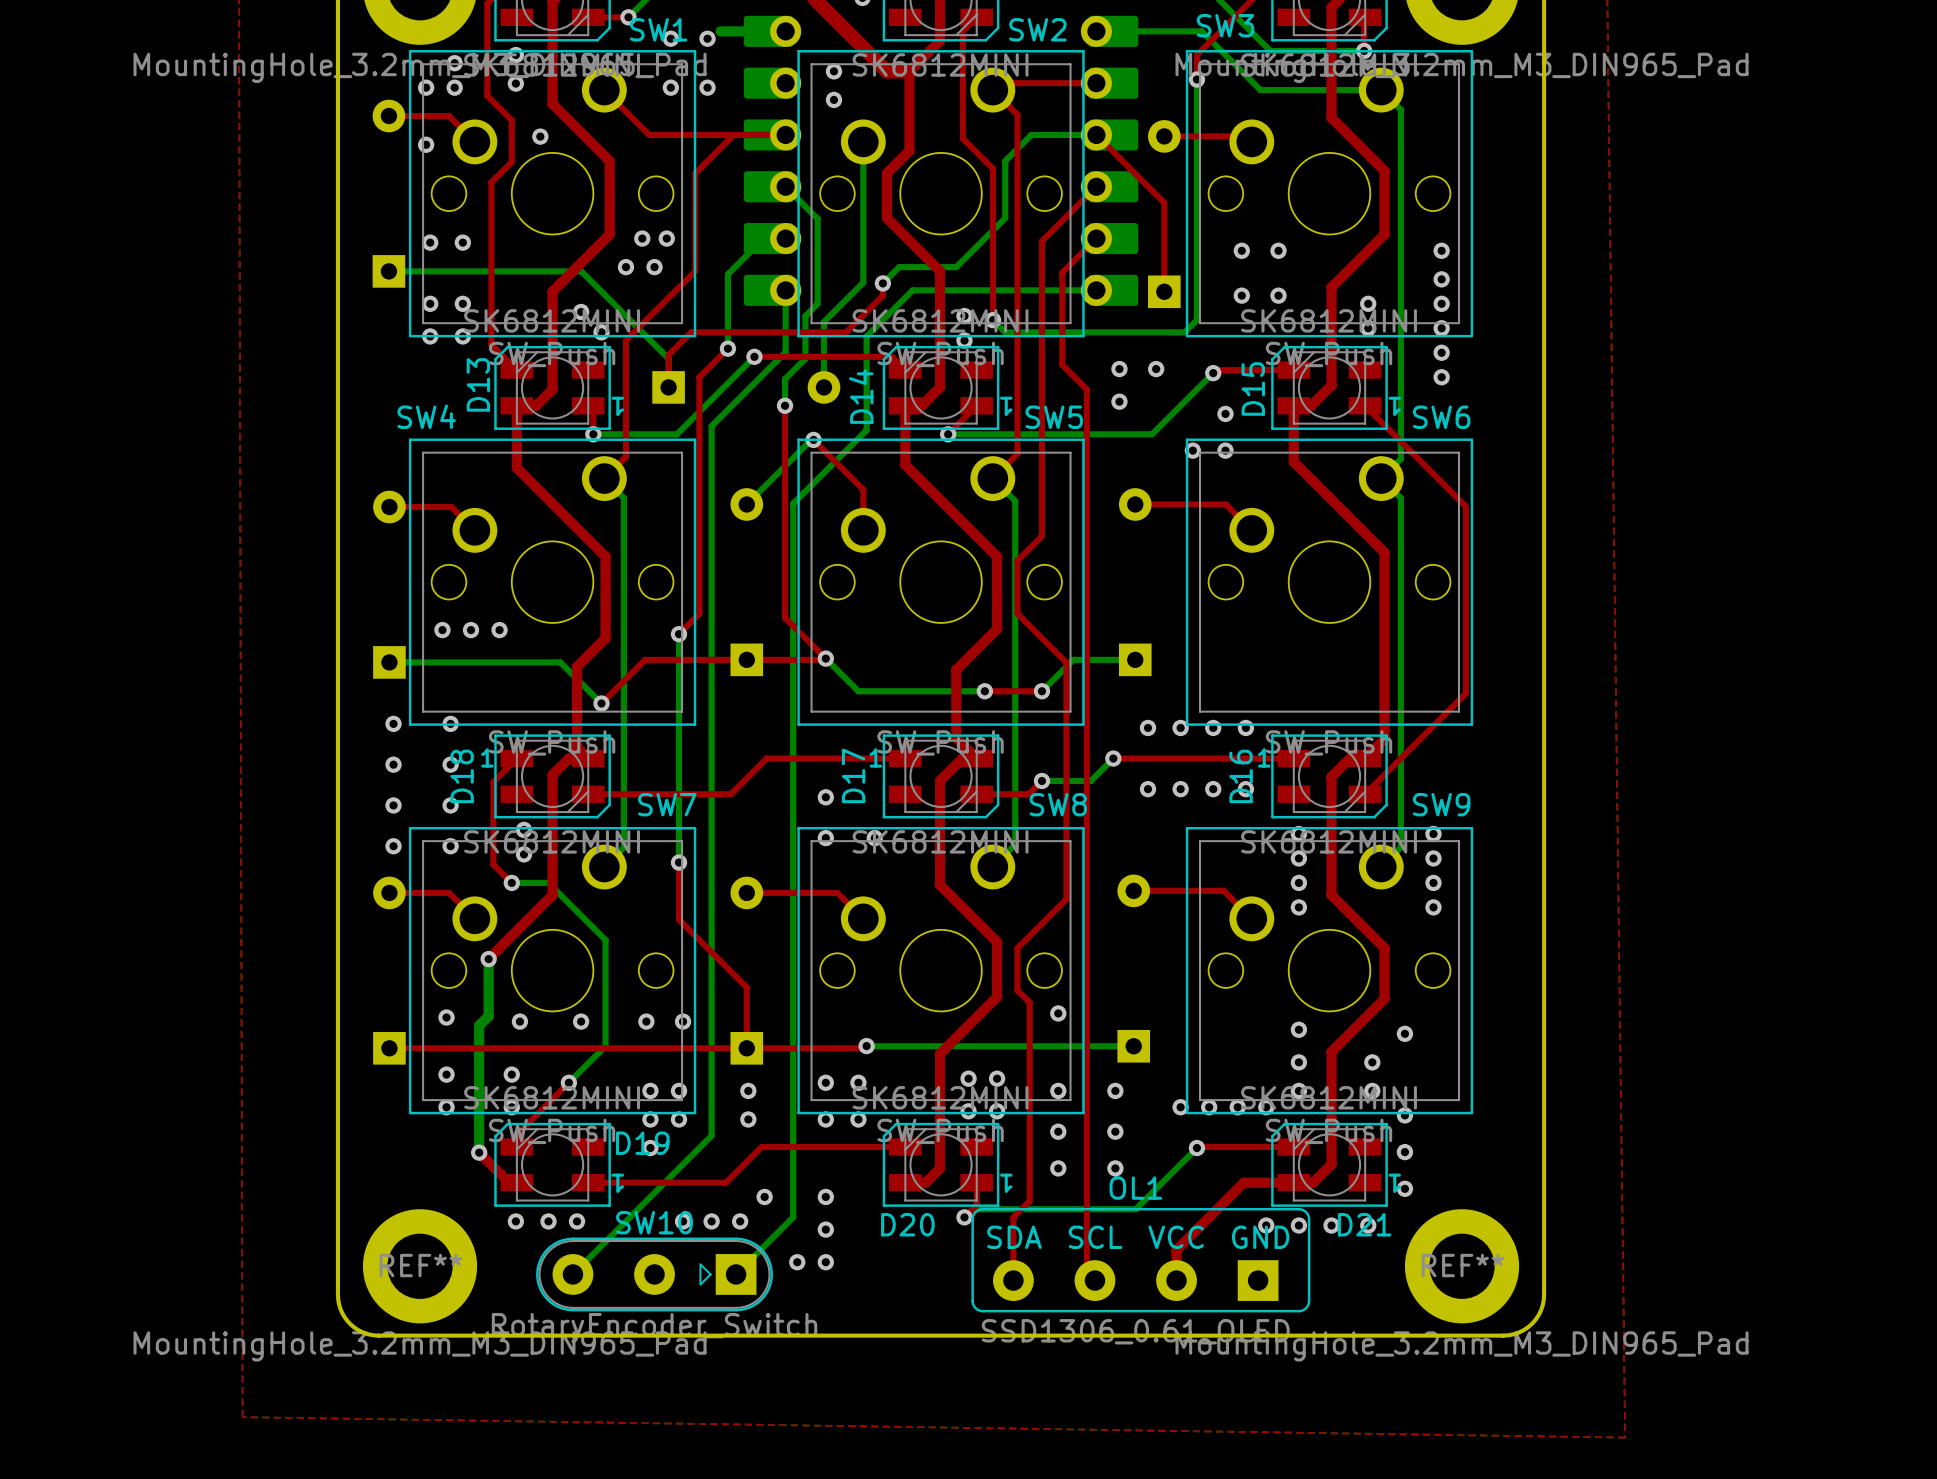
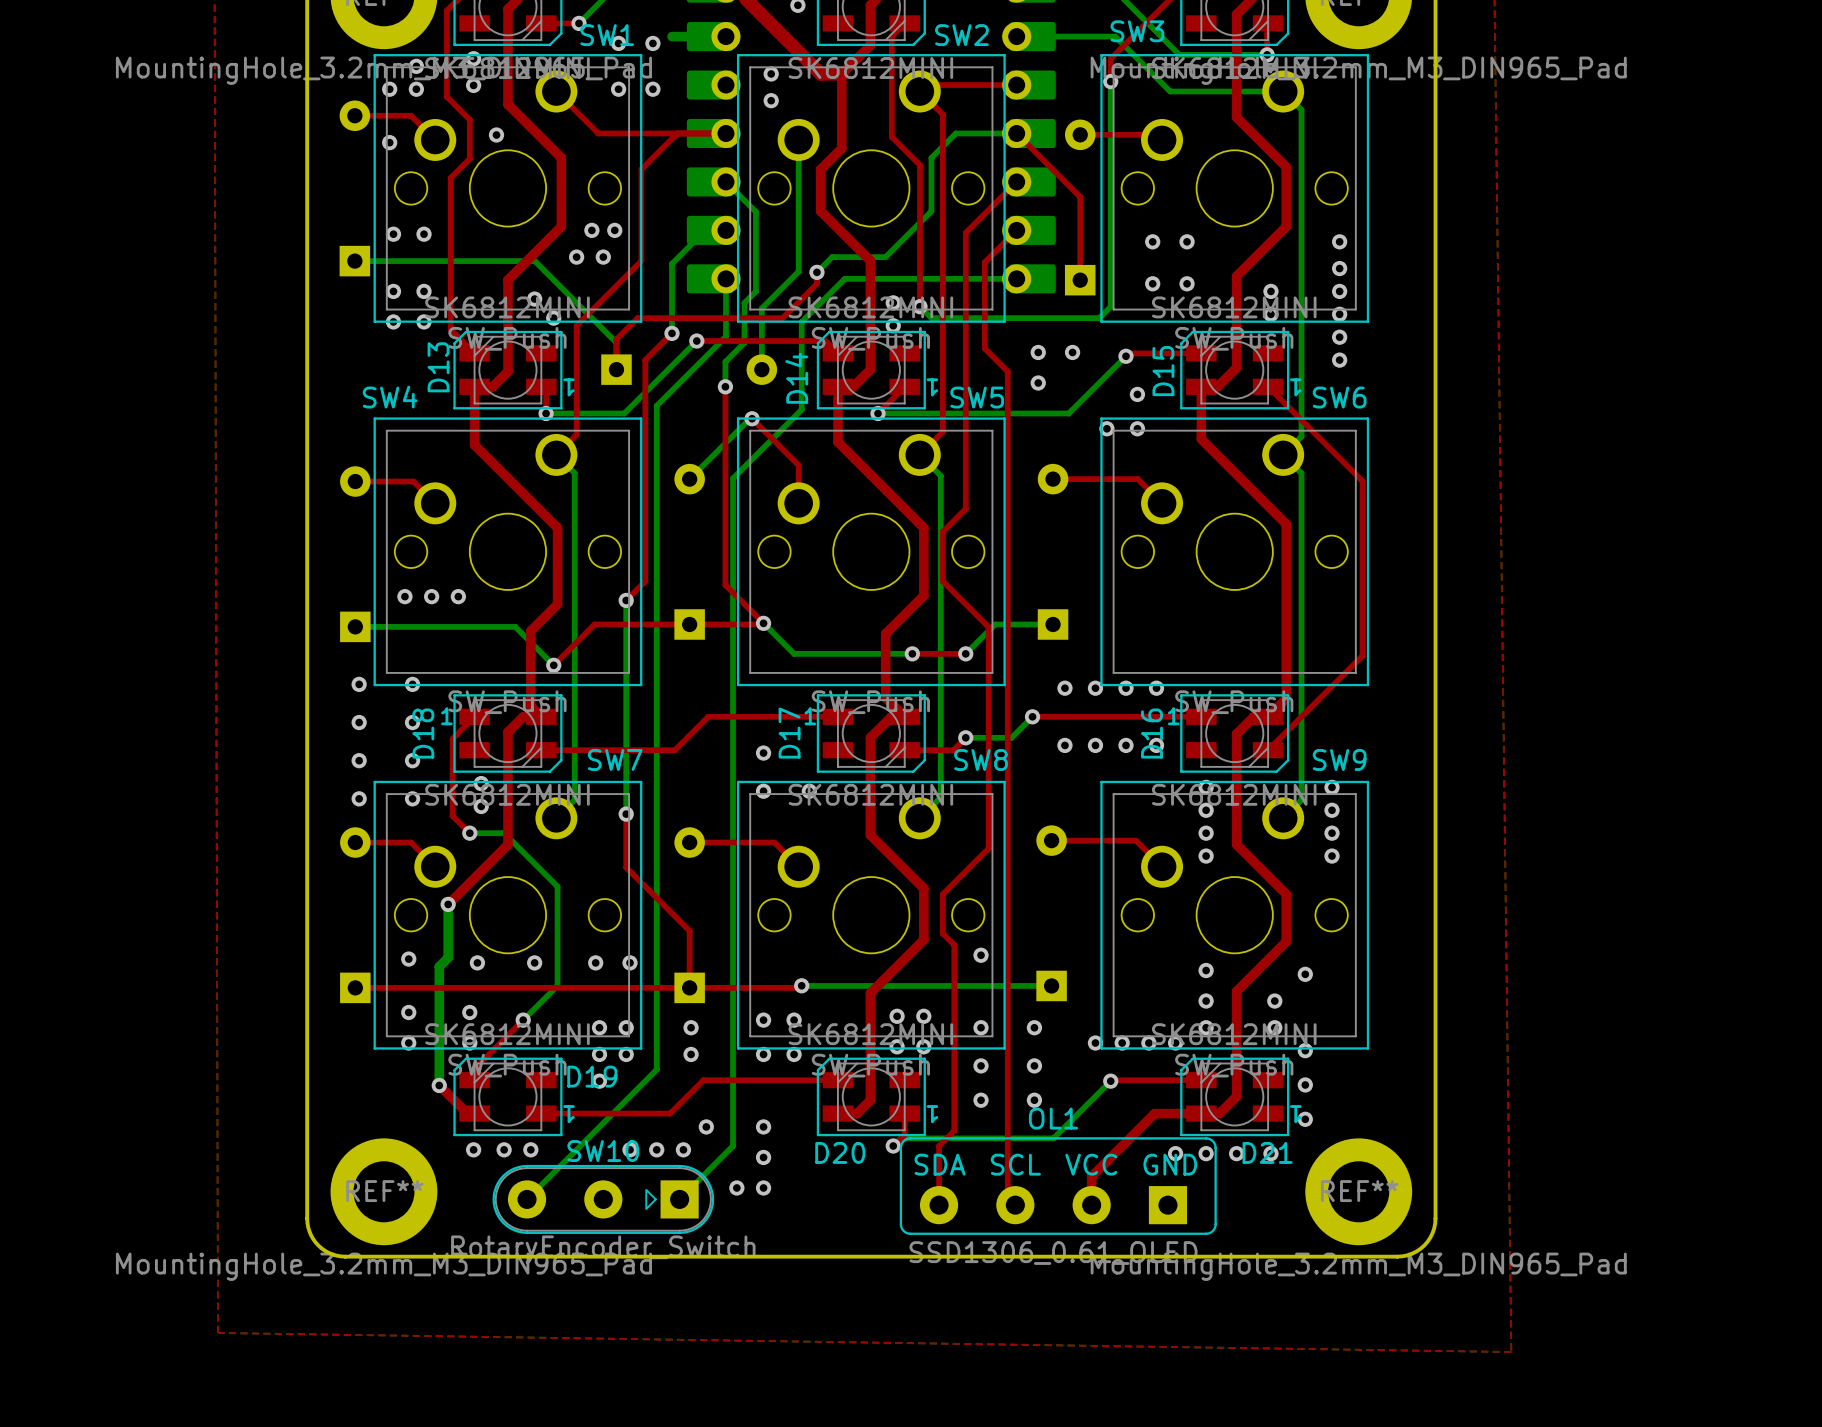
bottom track: (720, 31) (727, 31) -> none

